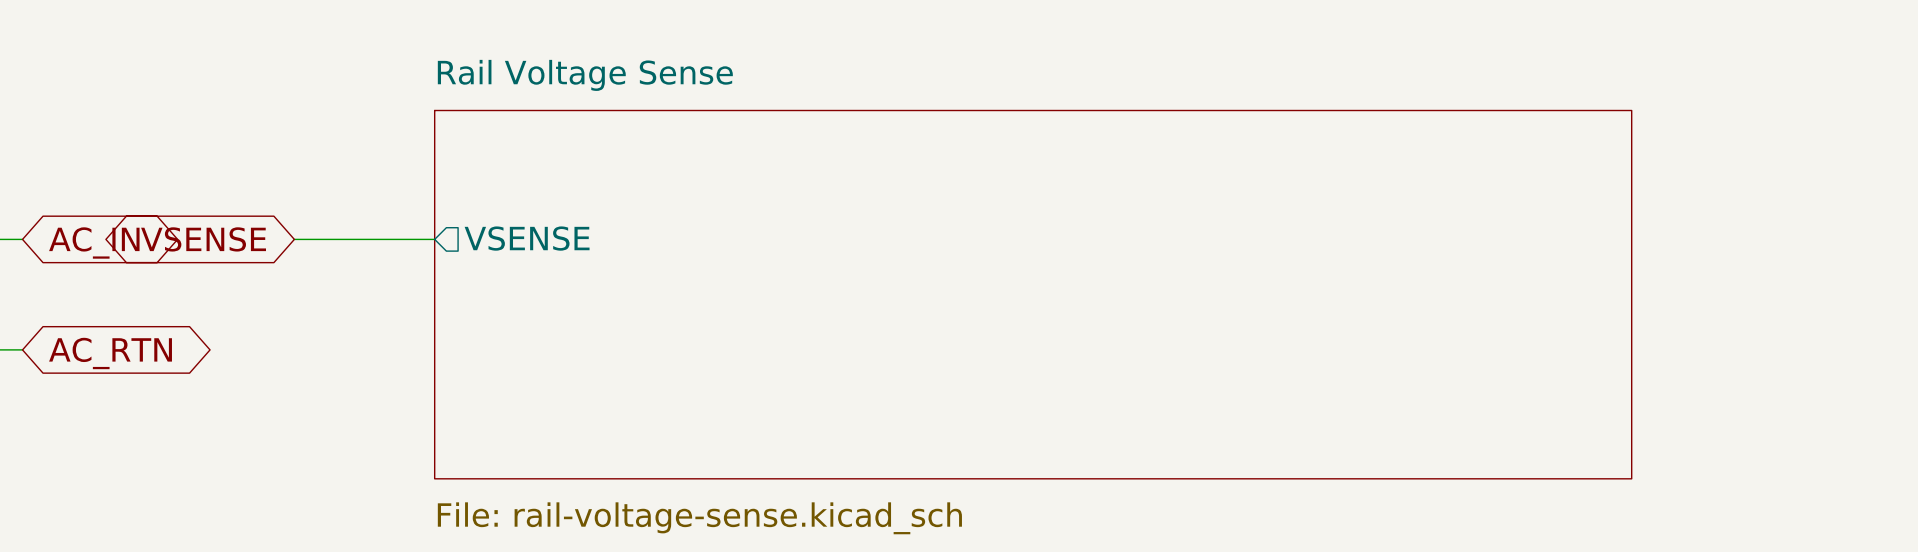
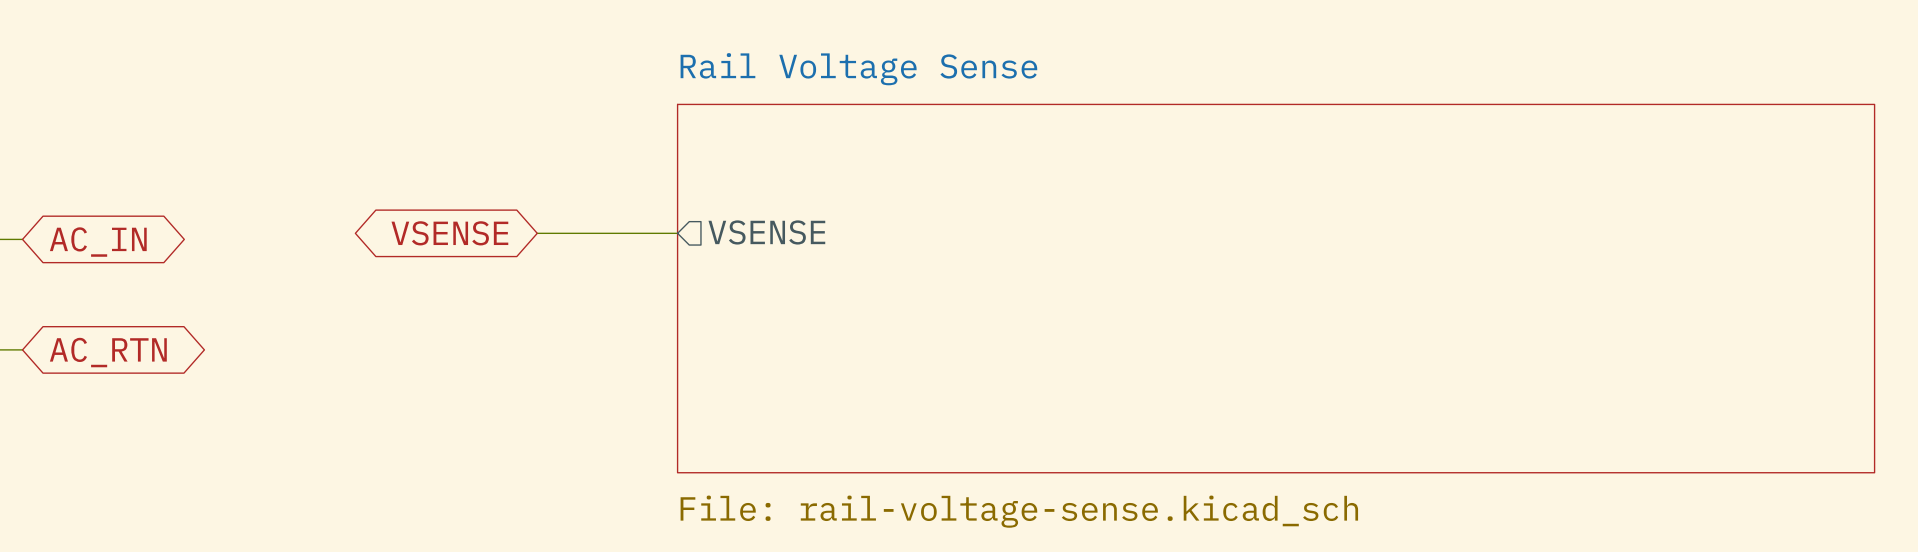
sheet pin position: VSENSE (527, 238) -> VSENSE (766, 232)
global label position: VSENSE (203, 239) -> VSENSE (449, 233)
wire: (294, 239) (434, 239) -> (537, 233) (677, 233)
sheet Rail Voltage Sense position: (1033, 294) -> (1276, 288)

